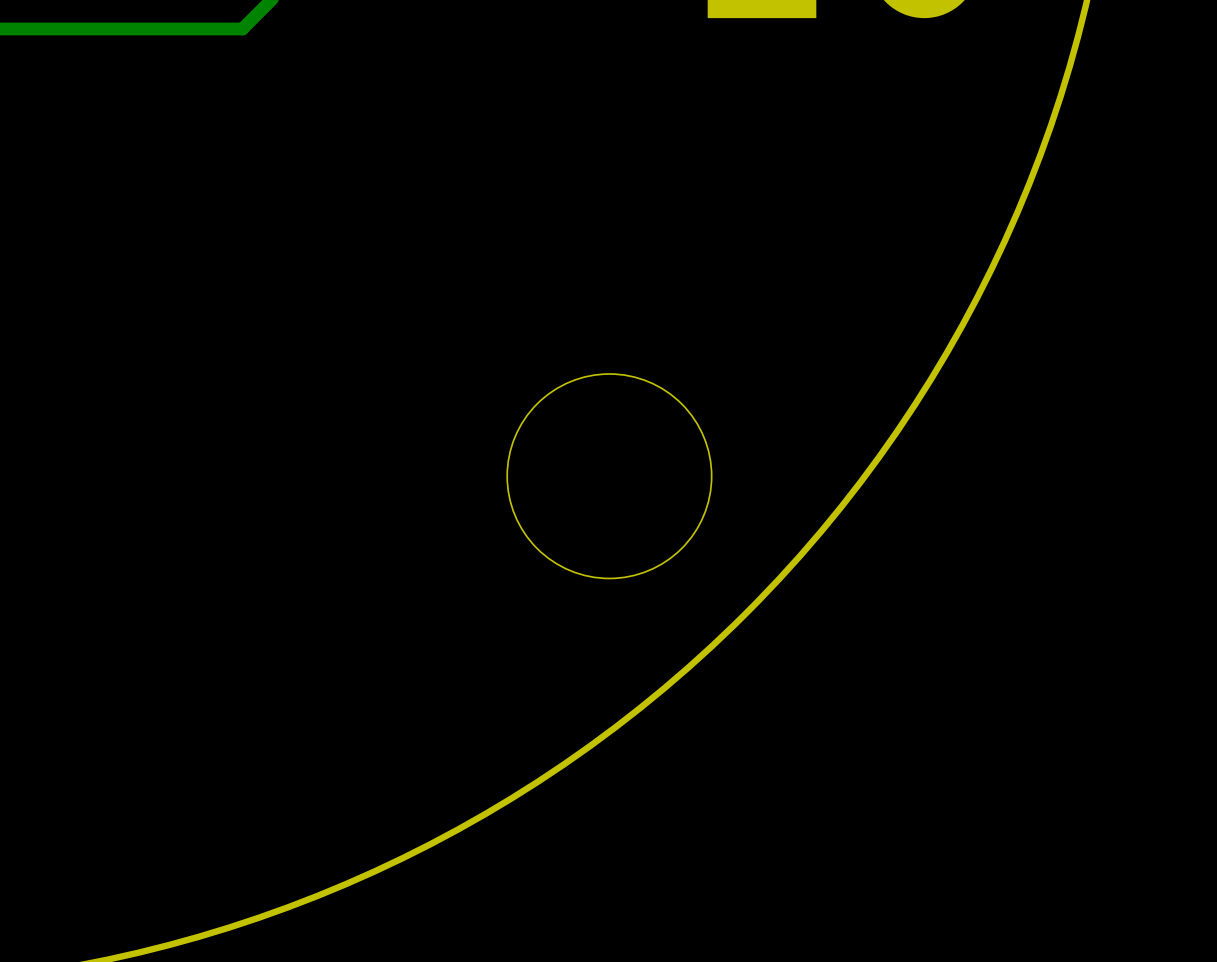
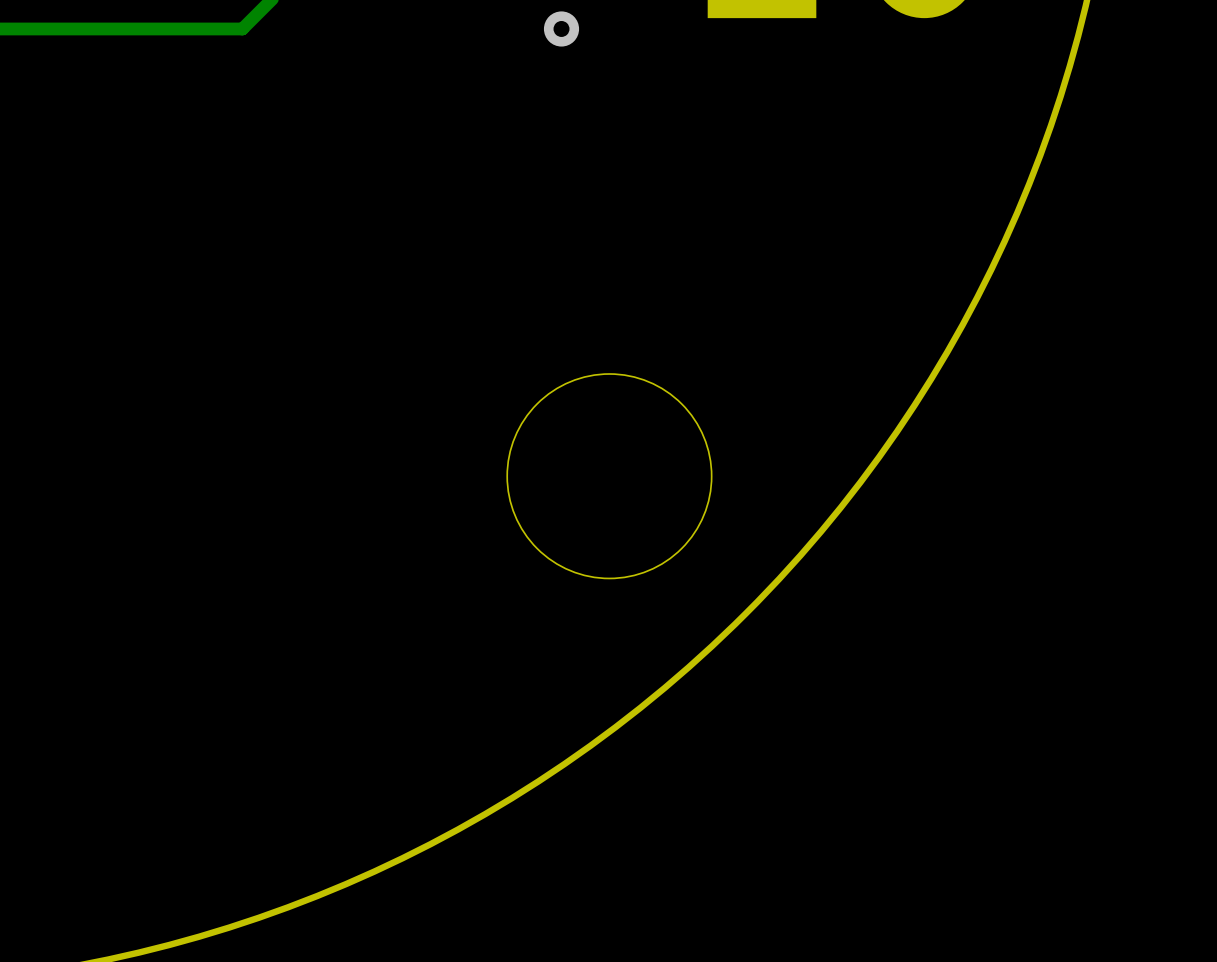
via: none -> (561, 28)

